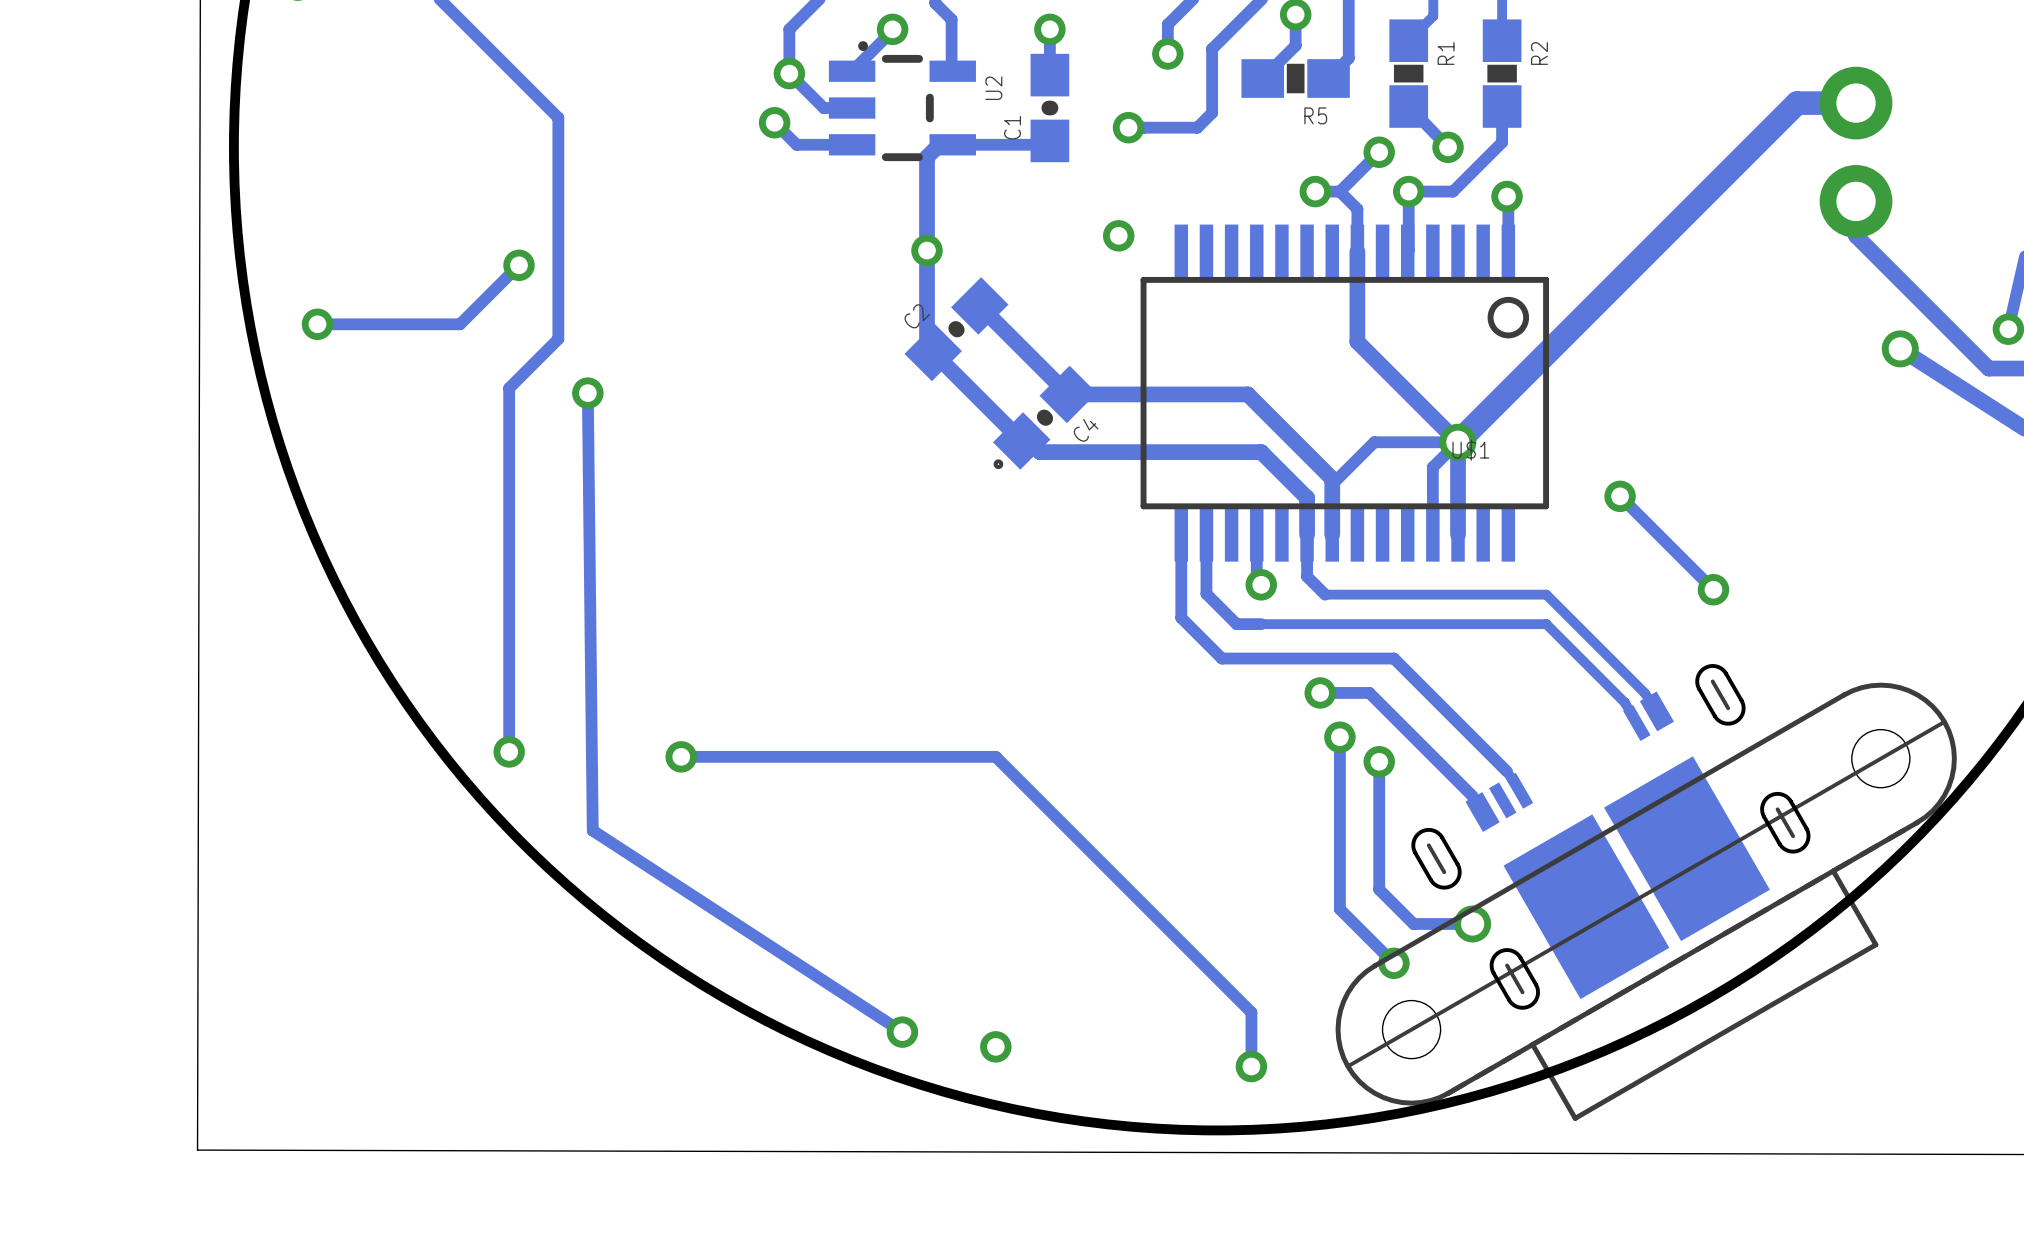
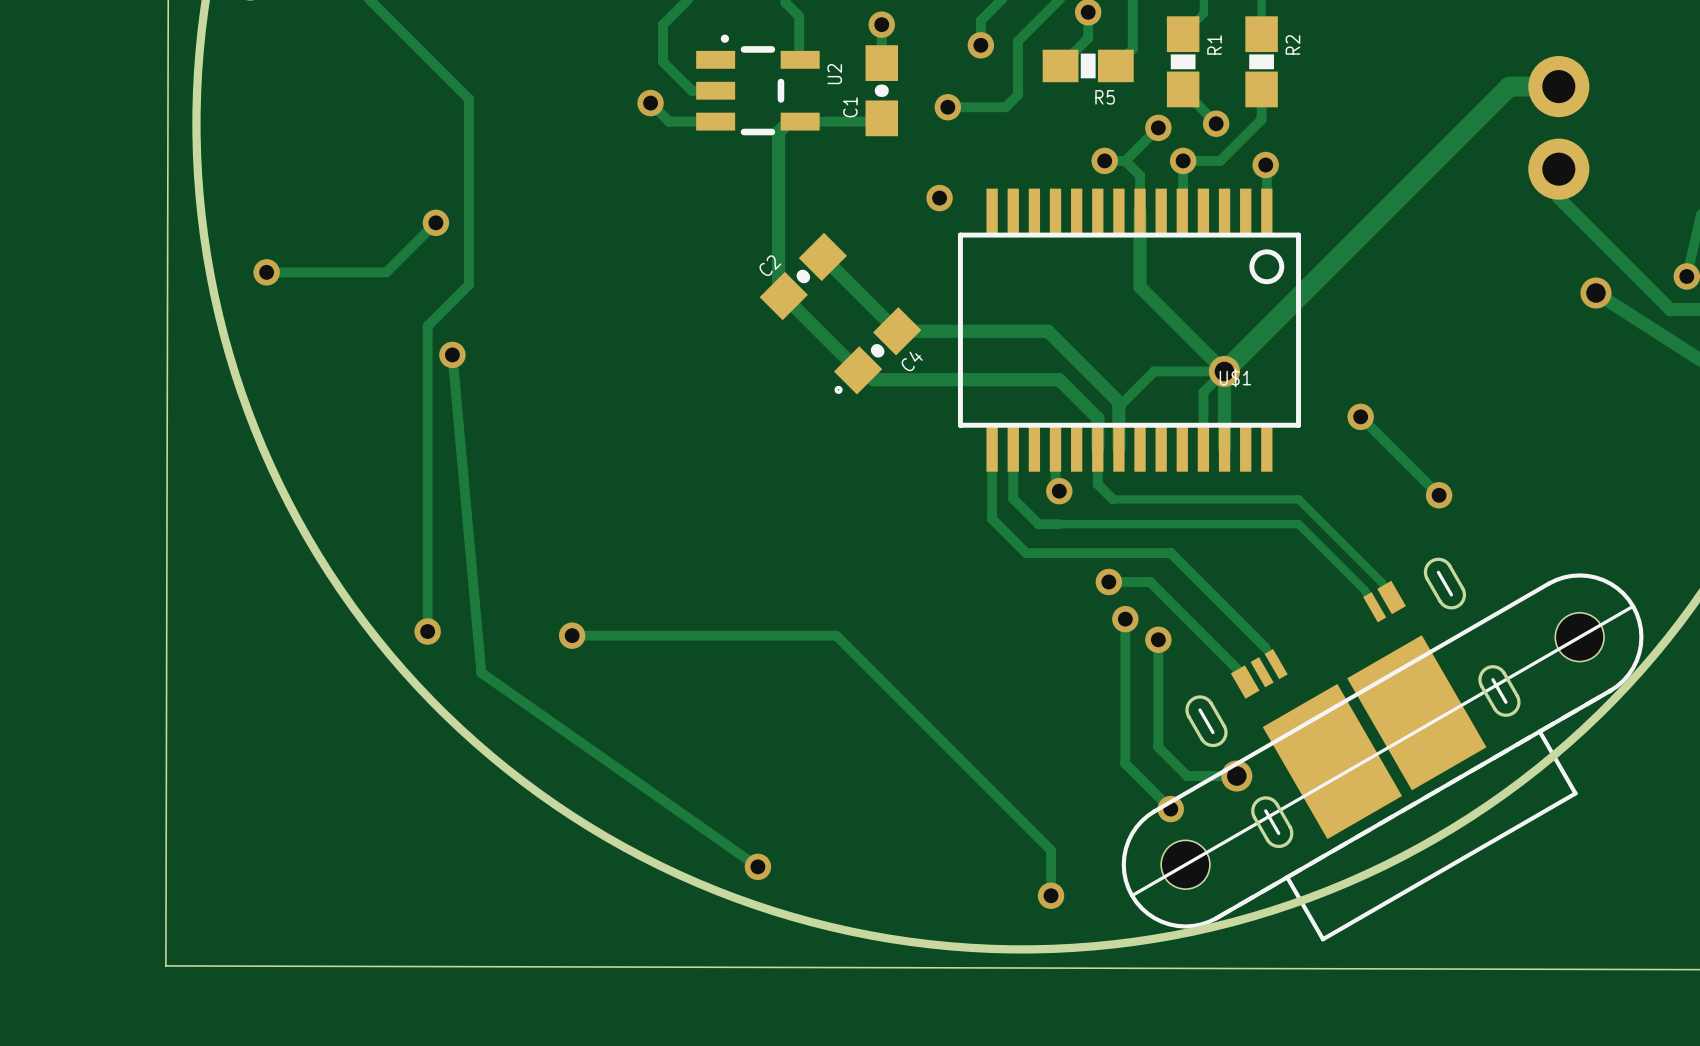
track: (892, 29) (852, 71) -> none
via: (892, 29) -> none
via: (789, 73) -> none
via: (927, 250) -> none
track: (587, 393) (592, 830) (902, 1032) -> (452, 354) (481, 672) (757, 866)
via position: (587, 393) -> (452, 354)
via: (995, 1046) -> none

